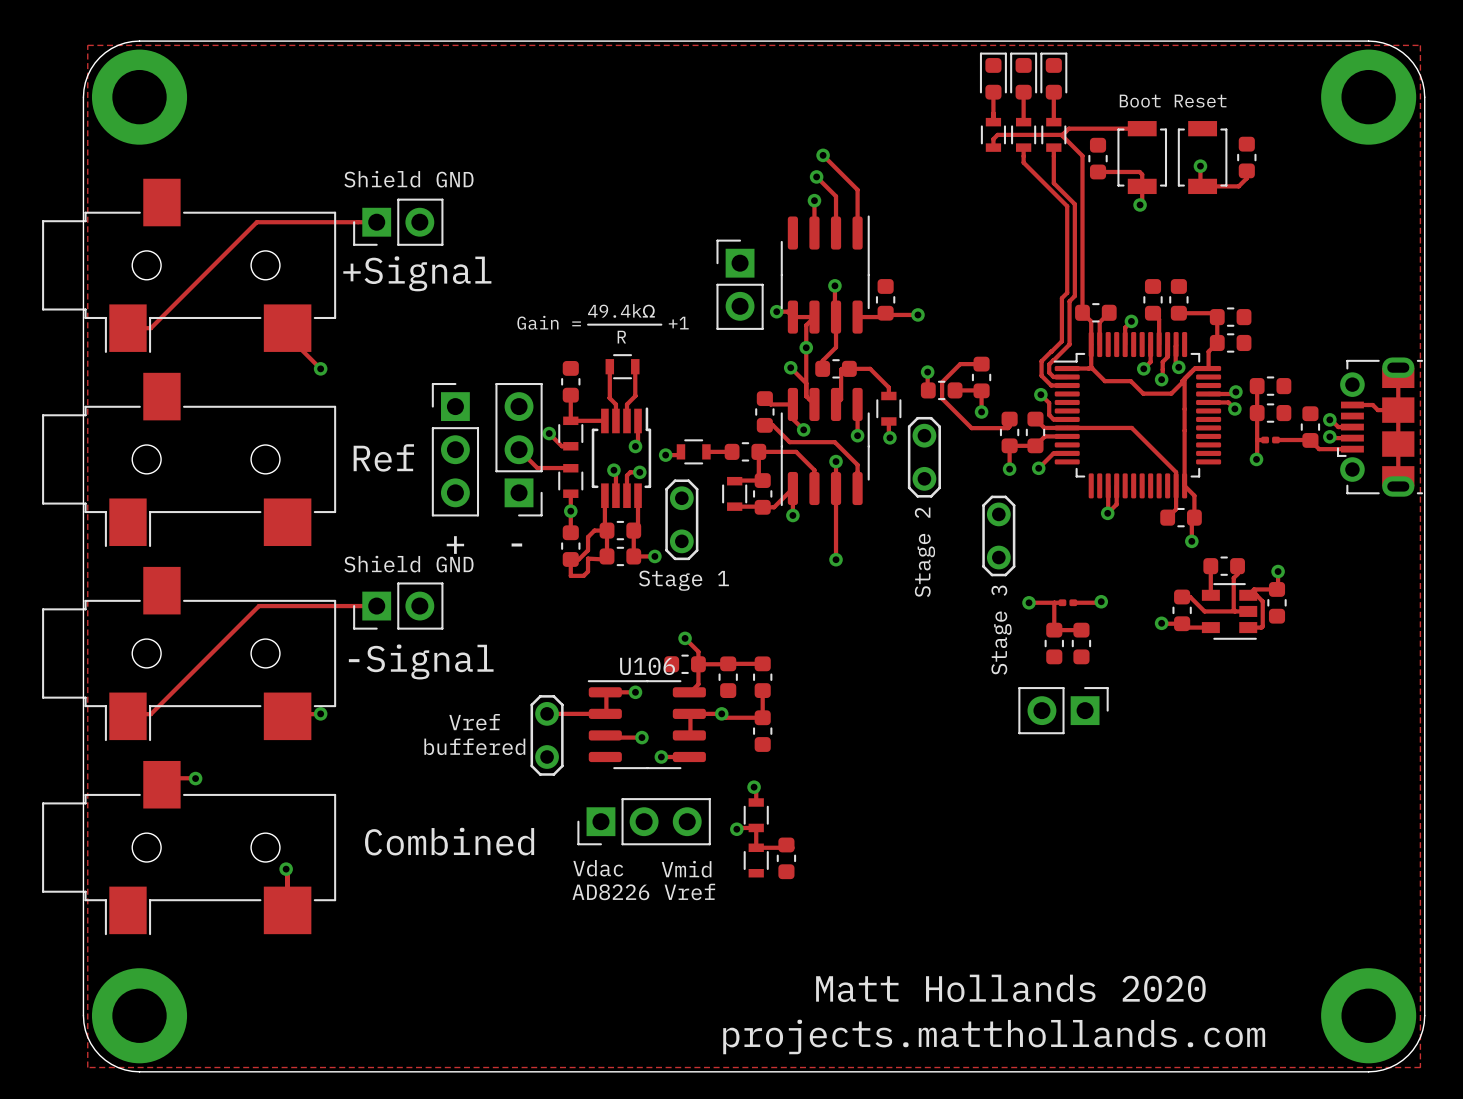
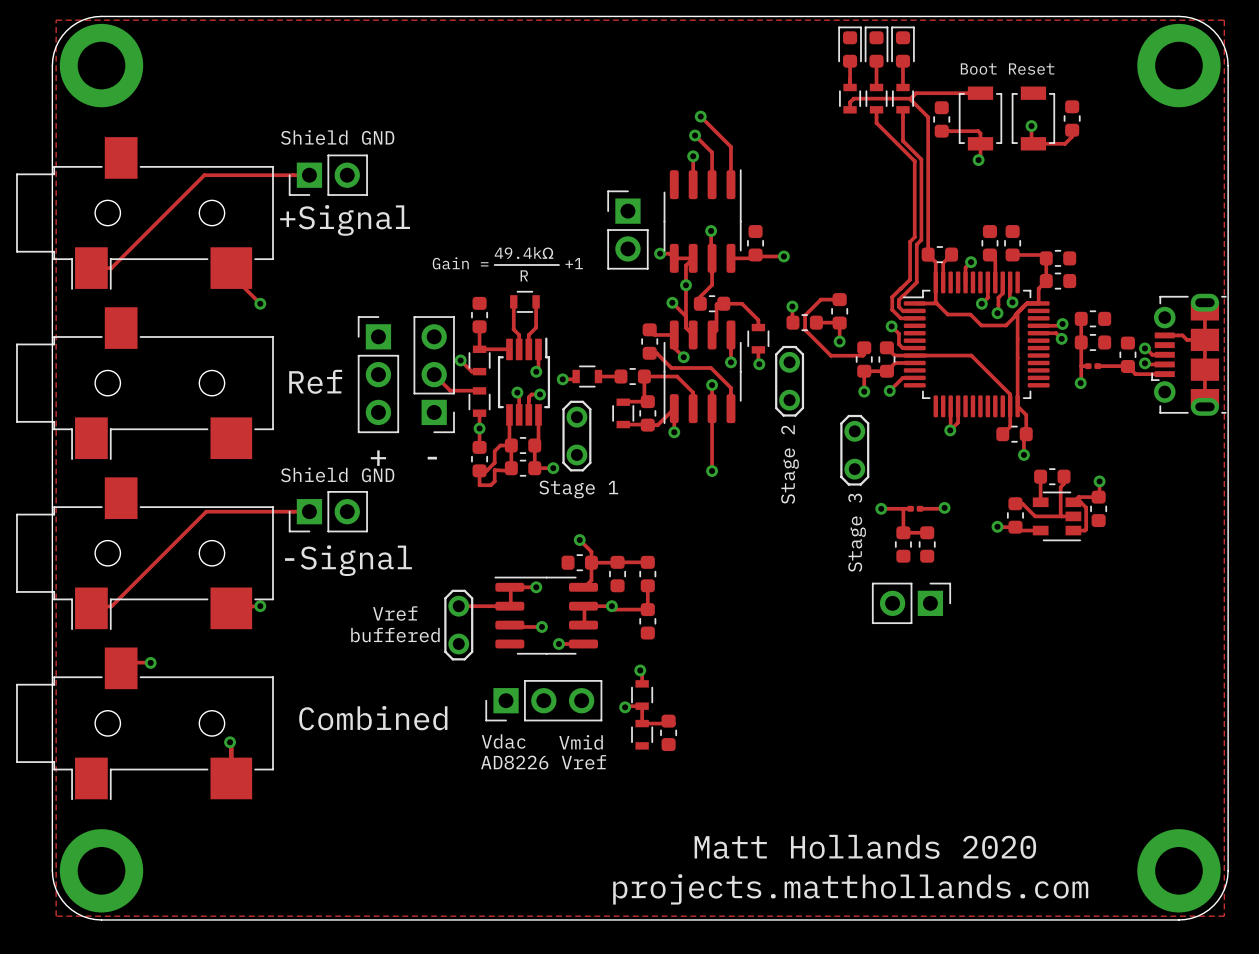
U106 name: U106 (647, 666) -> none

